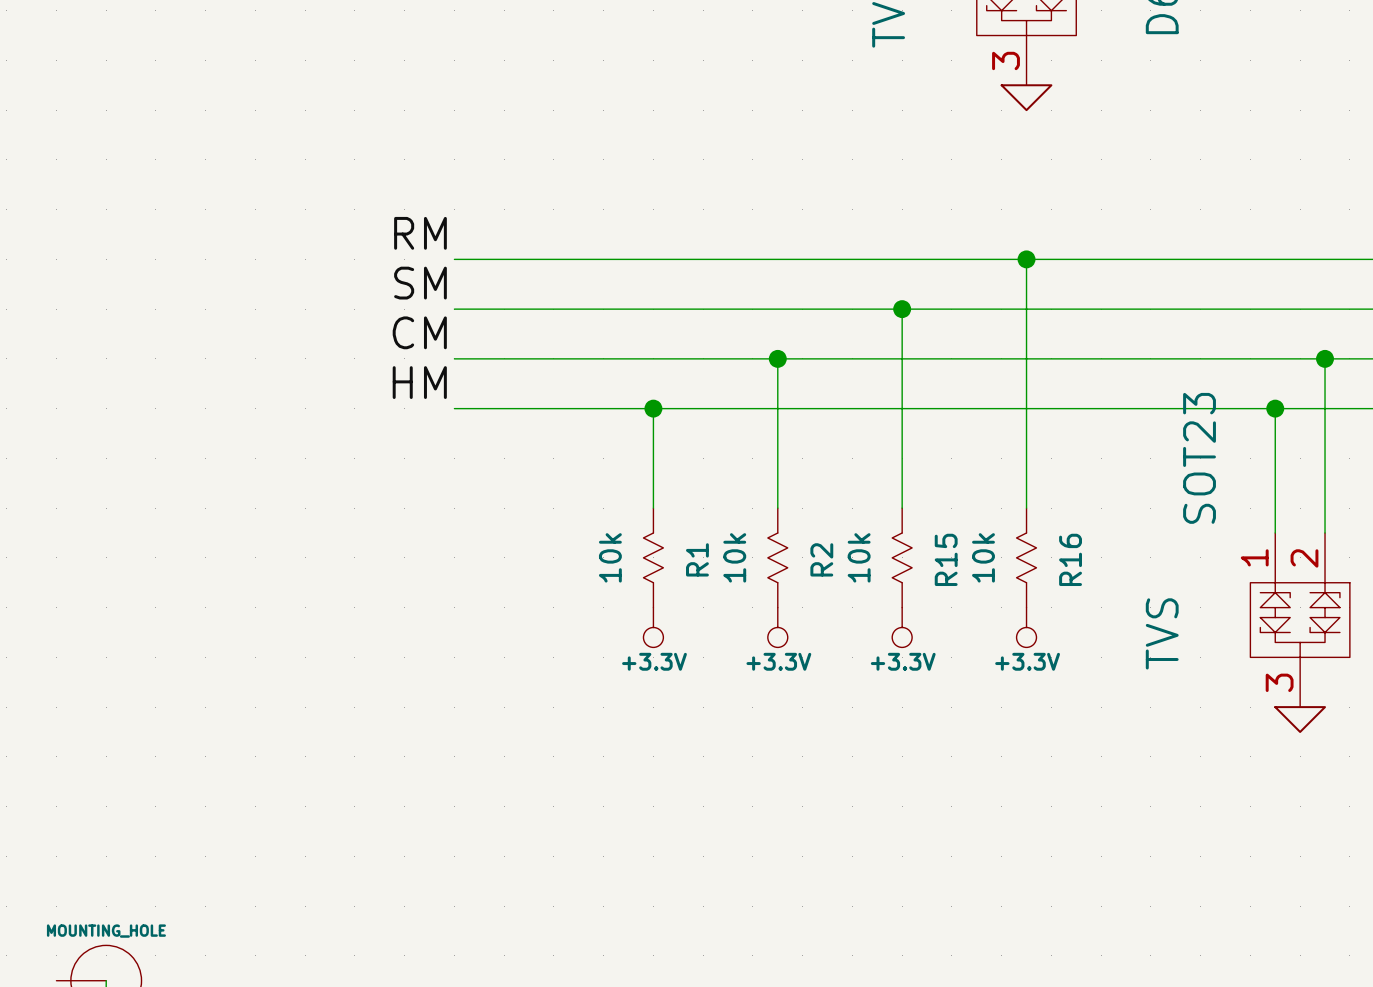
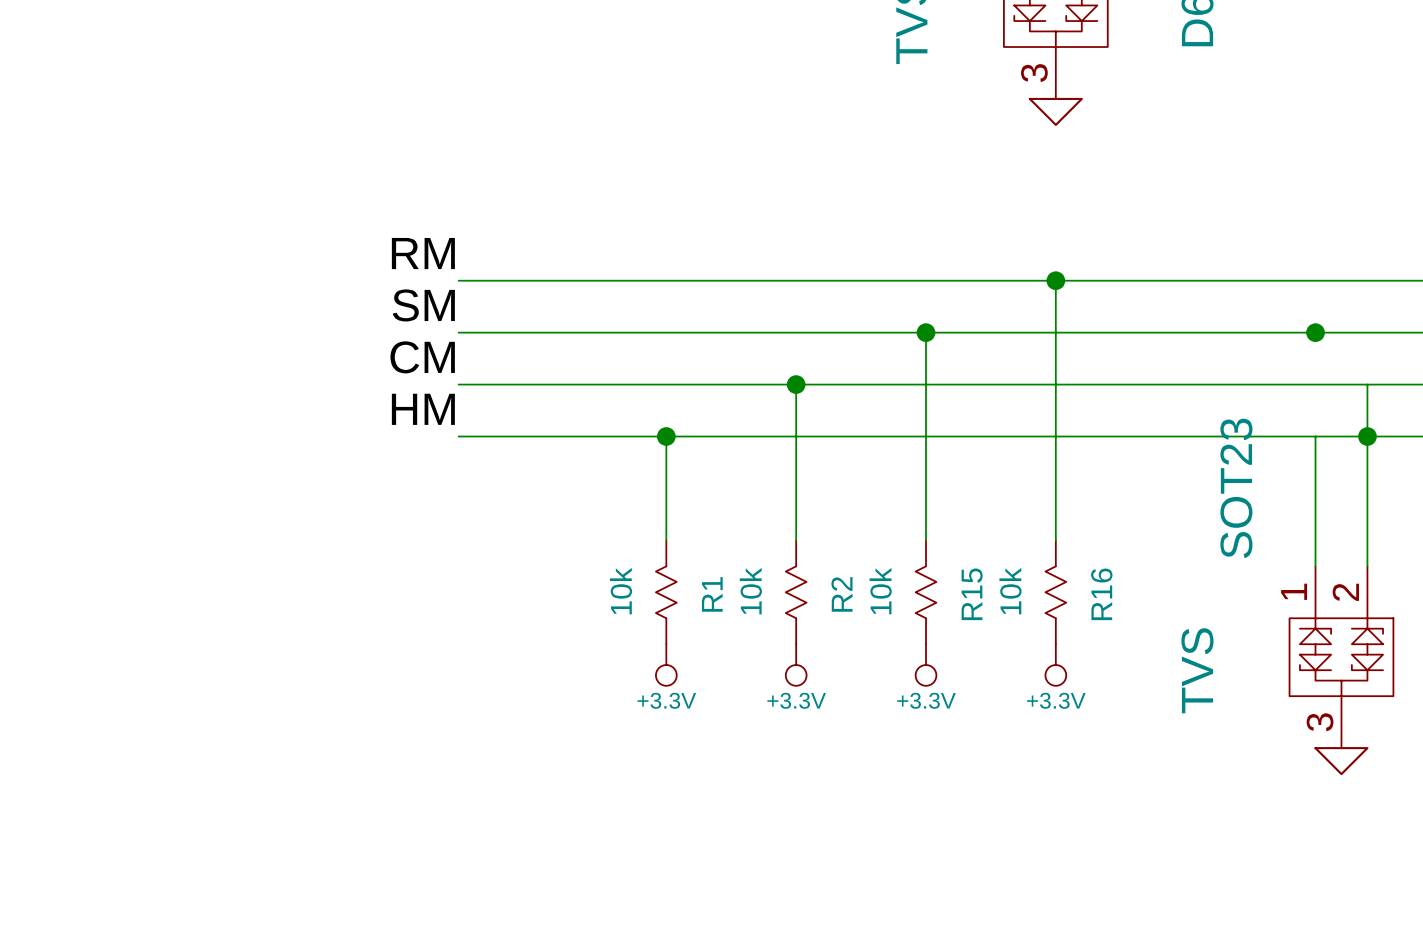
junction: none -> (1315, 332)
junction: (1325, 358) -> none
junction: (1275, 408) -> none
junction: none -> (1367, 436)

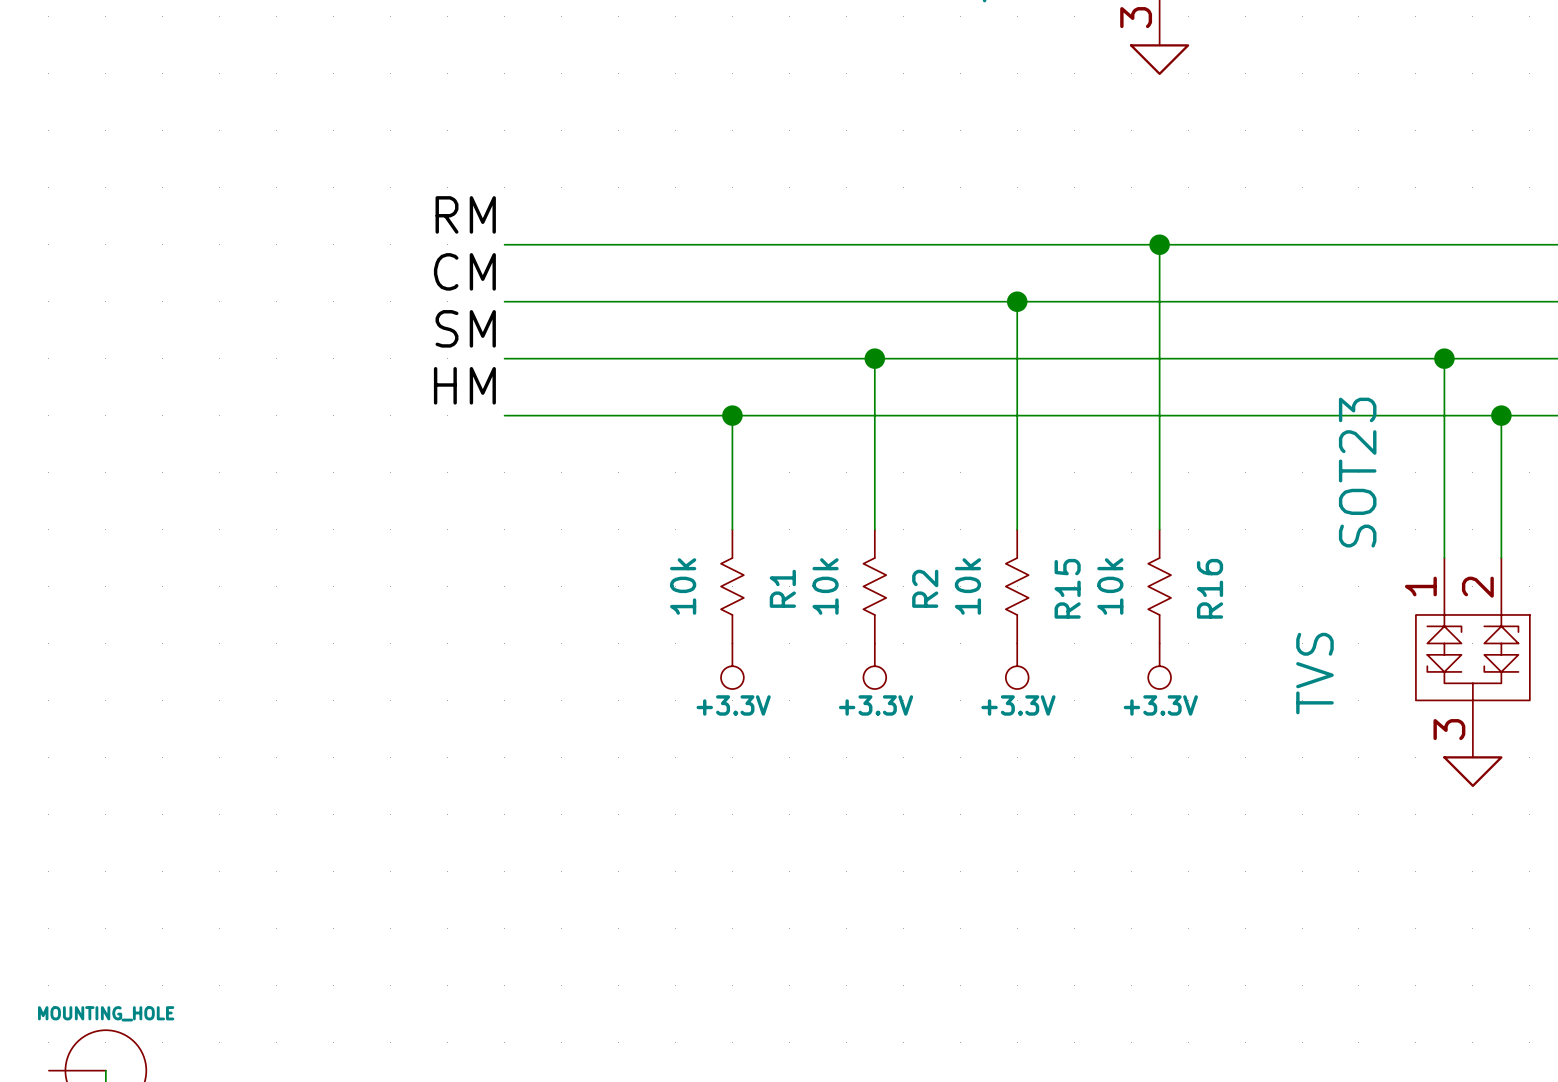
label: SM (423, 305) -> CM (464, 271)
junction position: (1315, 332) -> (1444, 358)
label: CM (422, 357) -> SM (465, 328)
wire: (1367, 384) (1367, 436) -> (1444, 358) (1444, 415)

